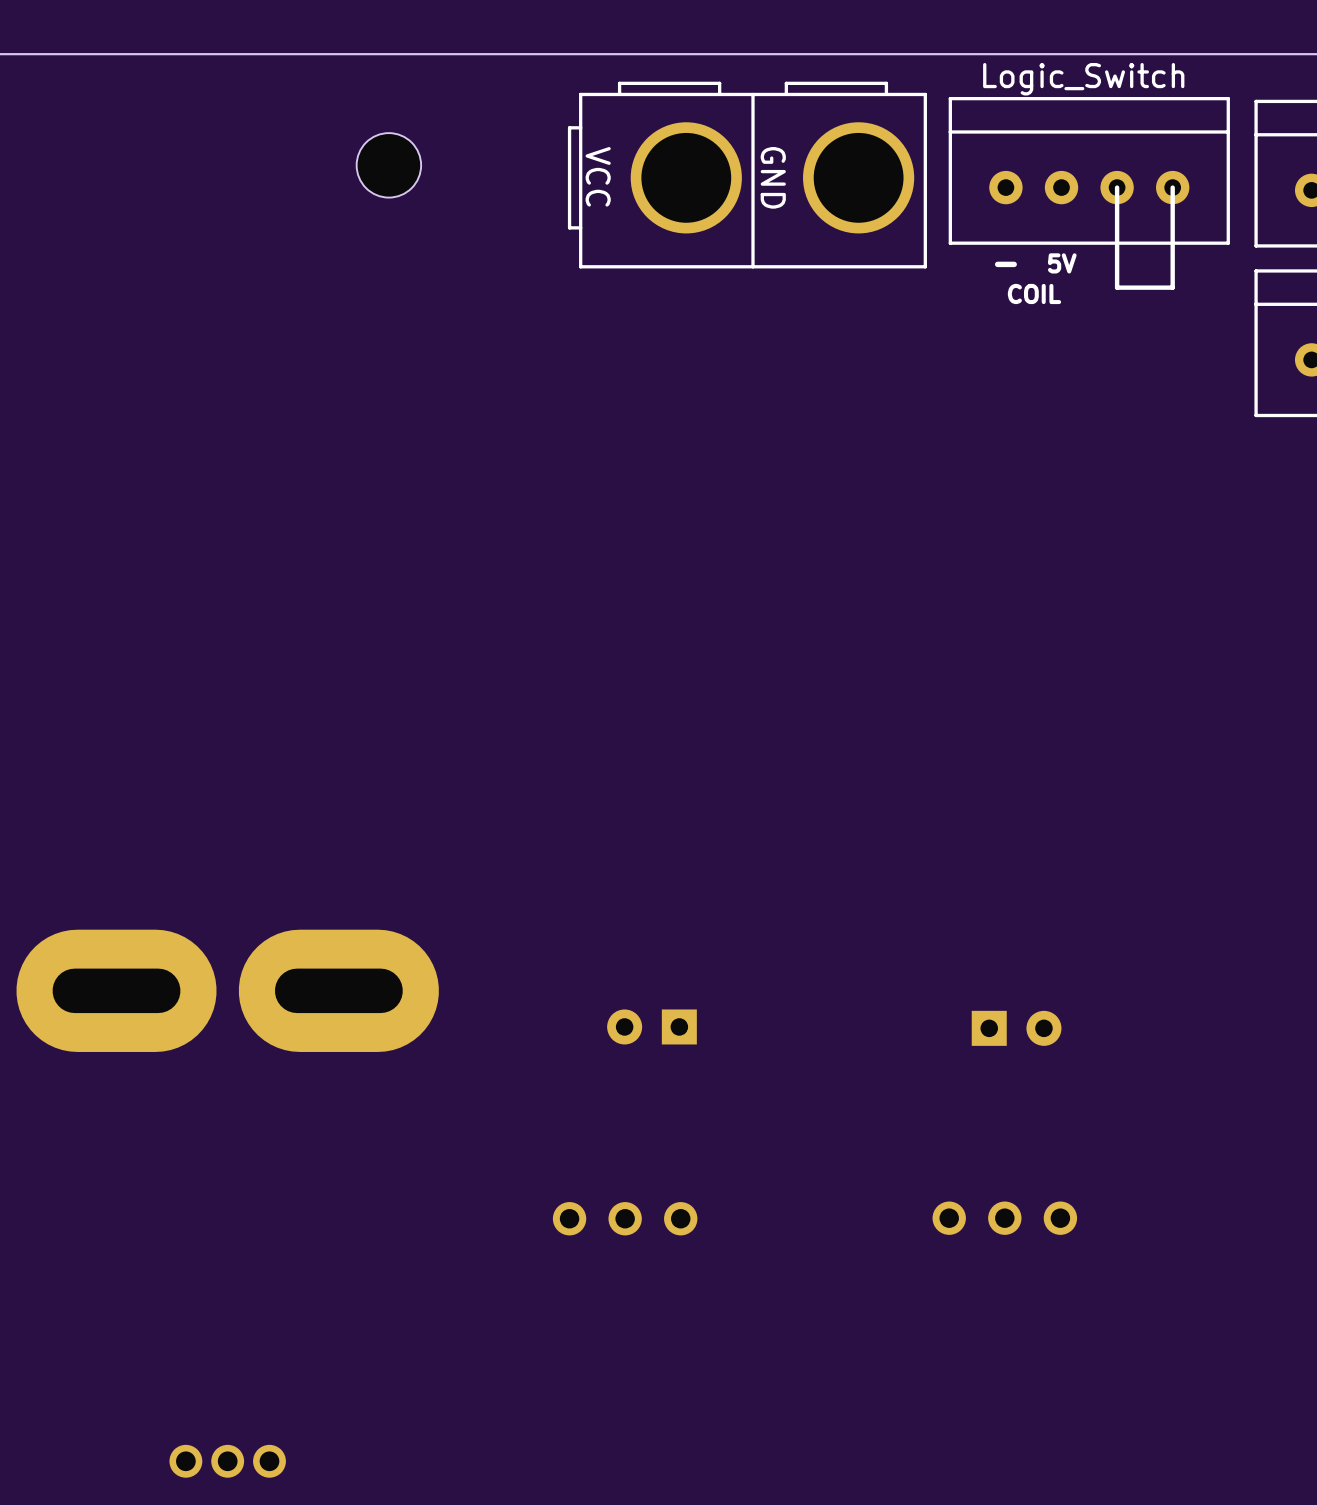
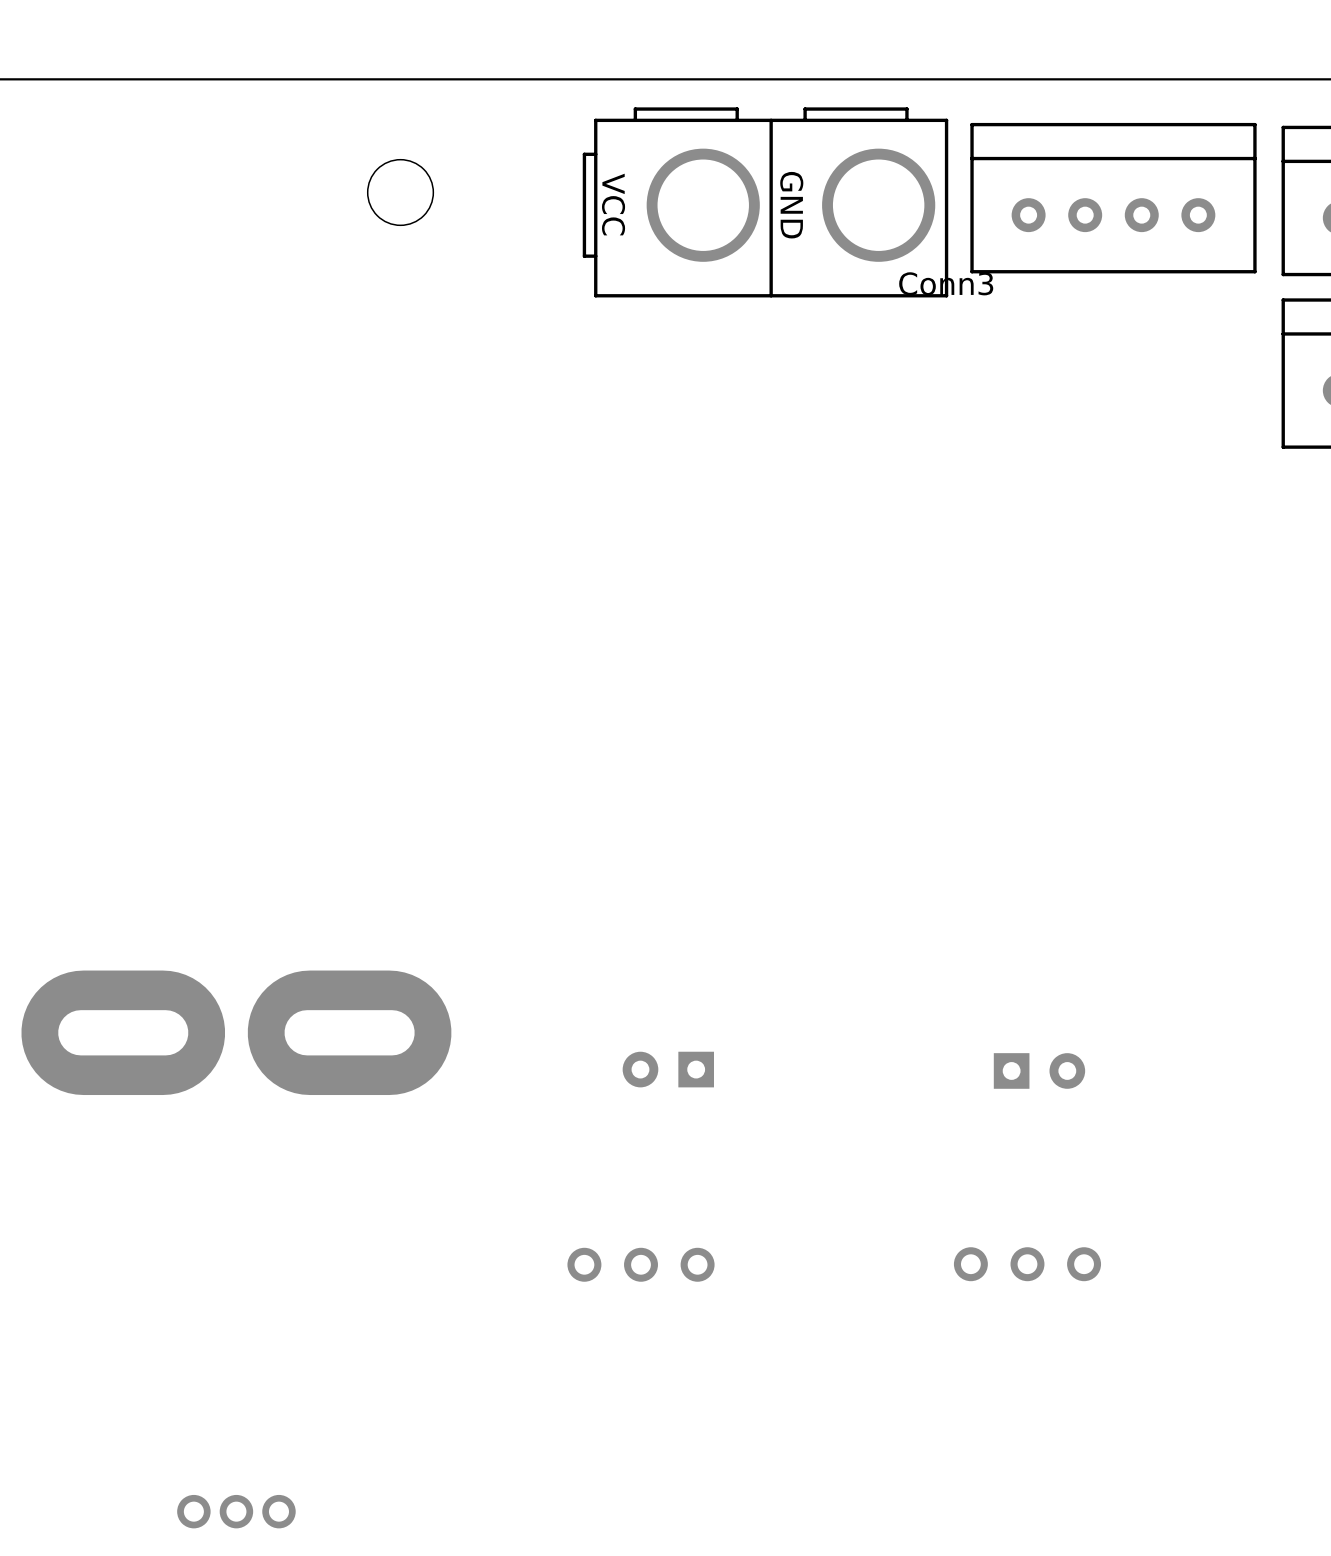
part value: Logic_Switch (1083, 79) -> none
line: (1172, 187) (1172, 287) (1117, 287) (1117, 187) -> none
Conn3 name: none -> Conn3 (946, 283)
text: 5V (1062, 263) -> none
text: - (1005, 264) -> none
text: COIL (1034, 293) -> none

